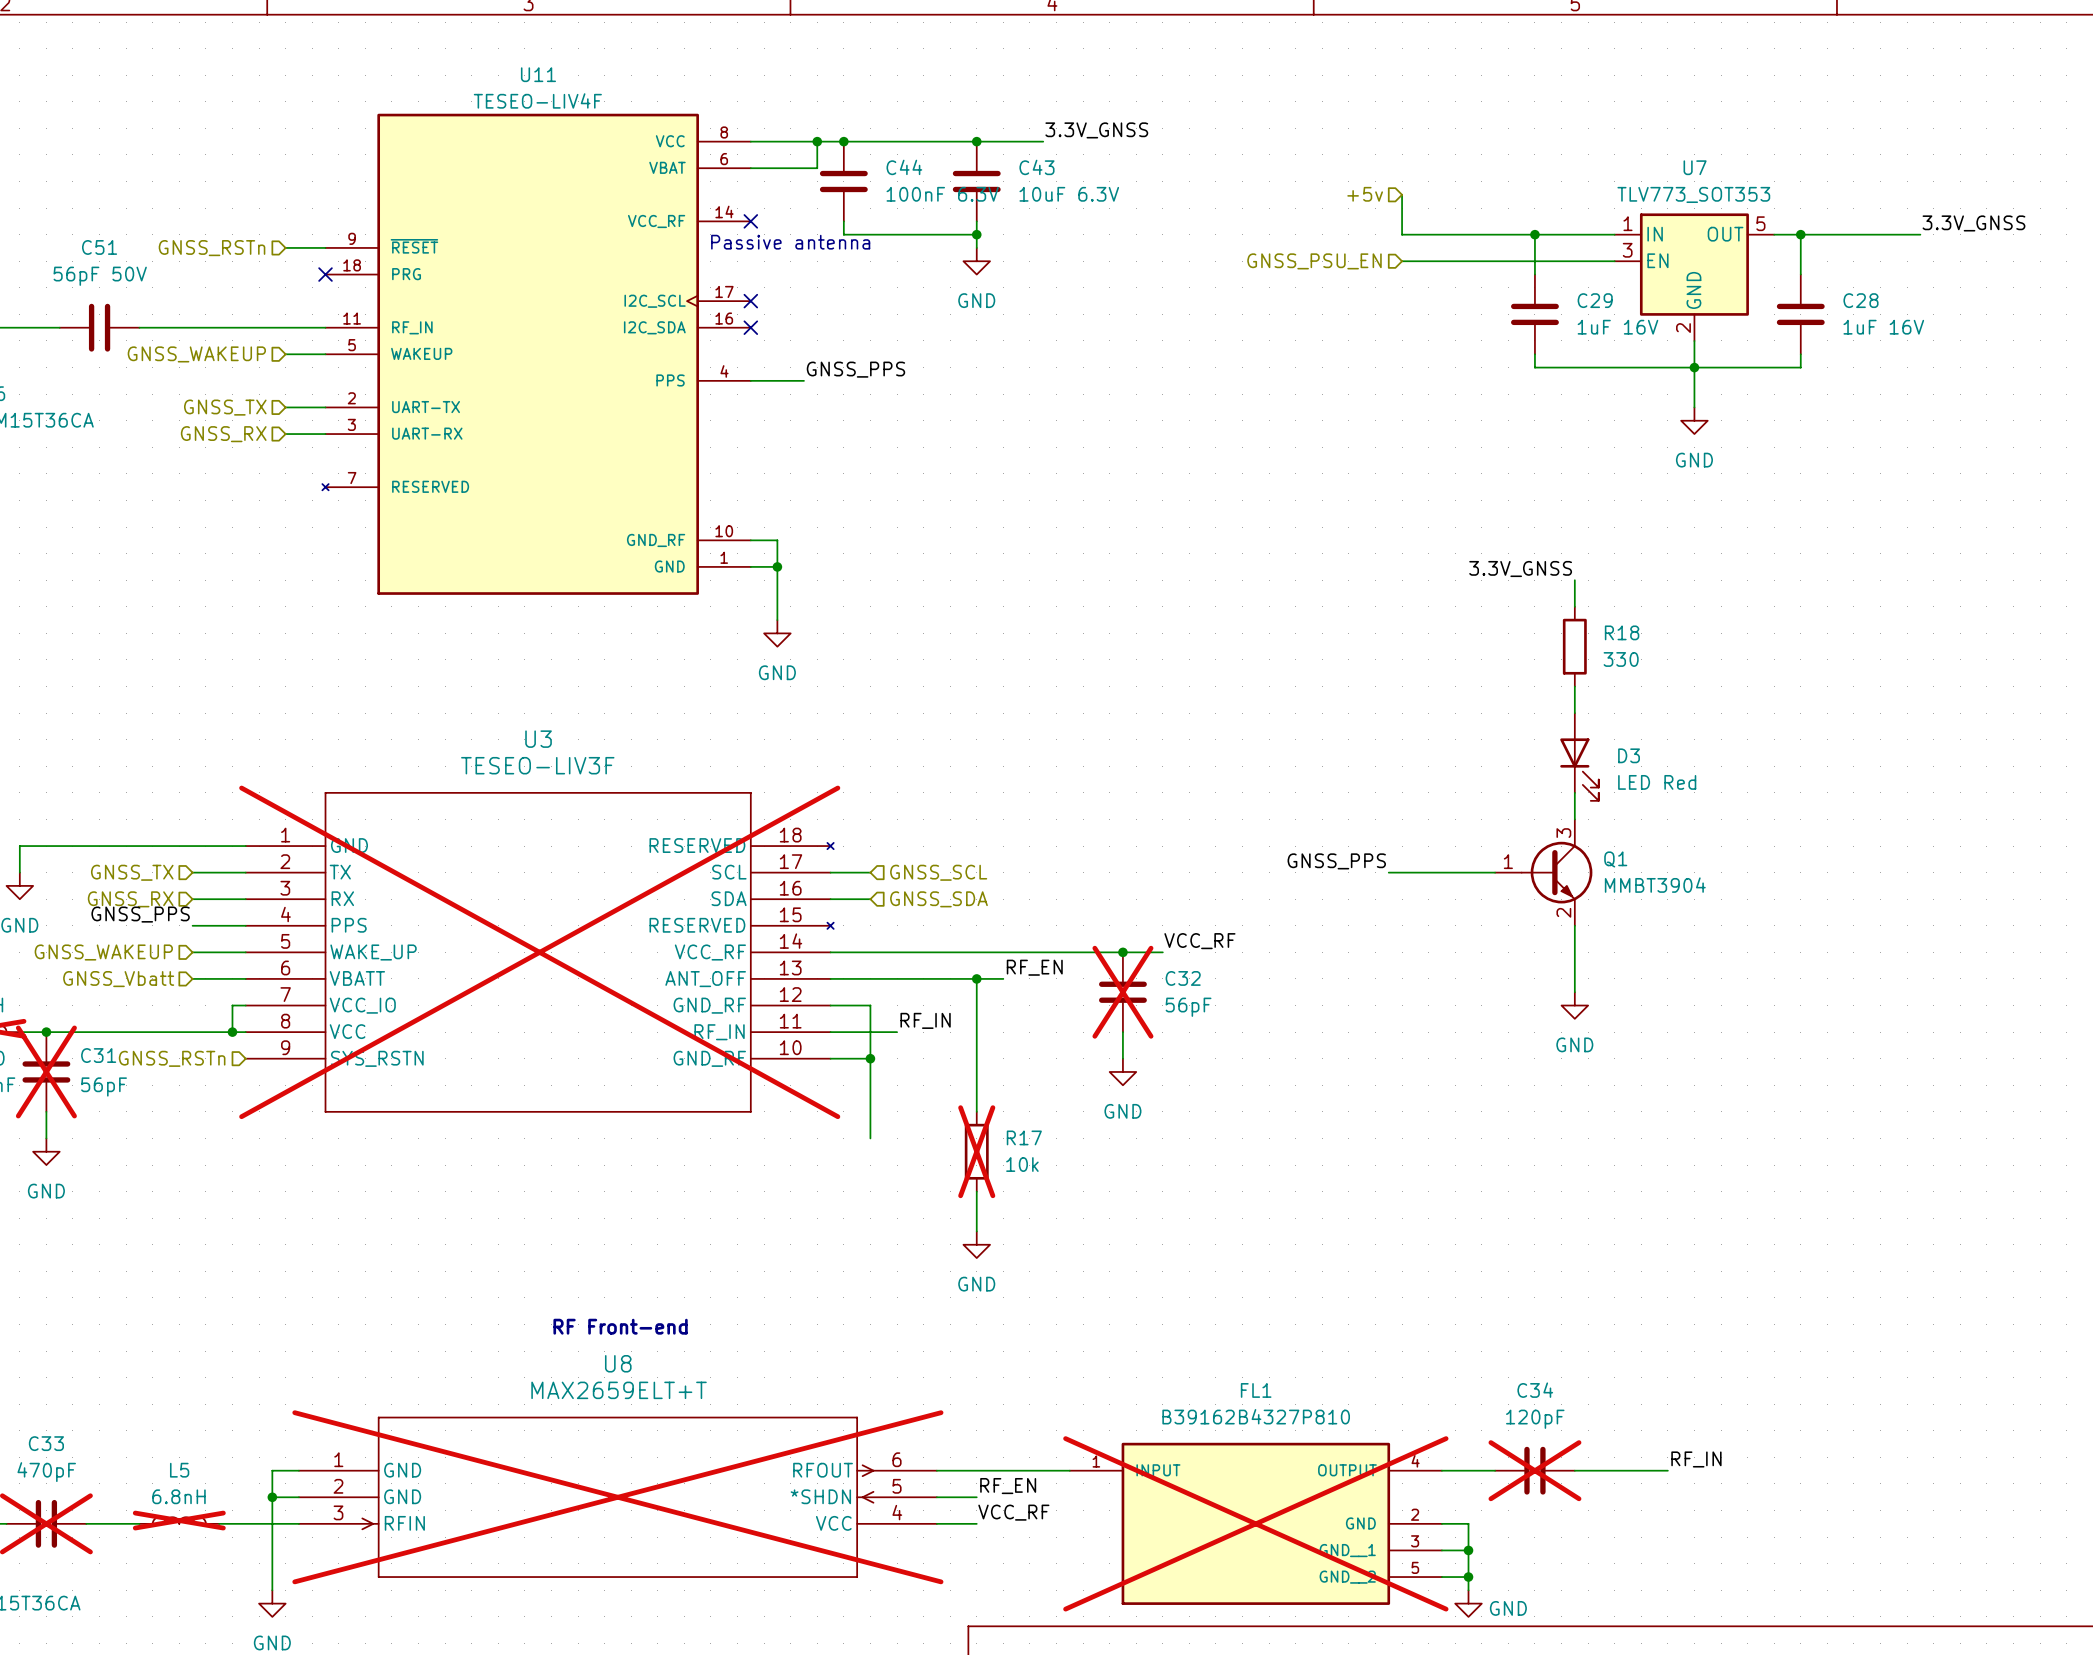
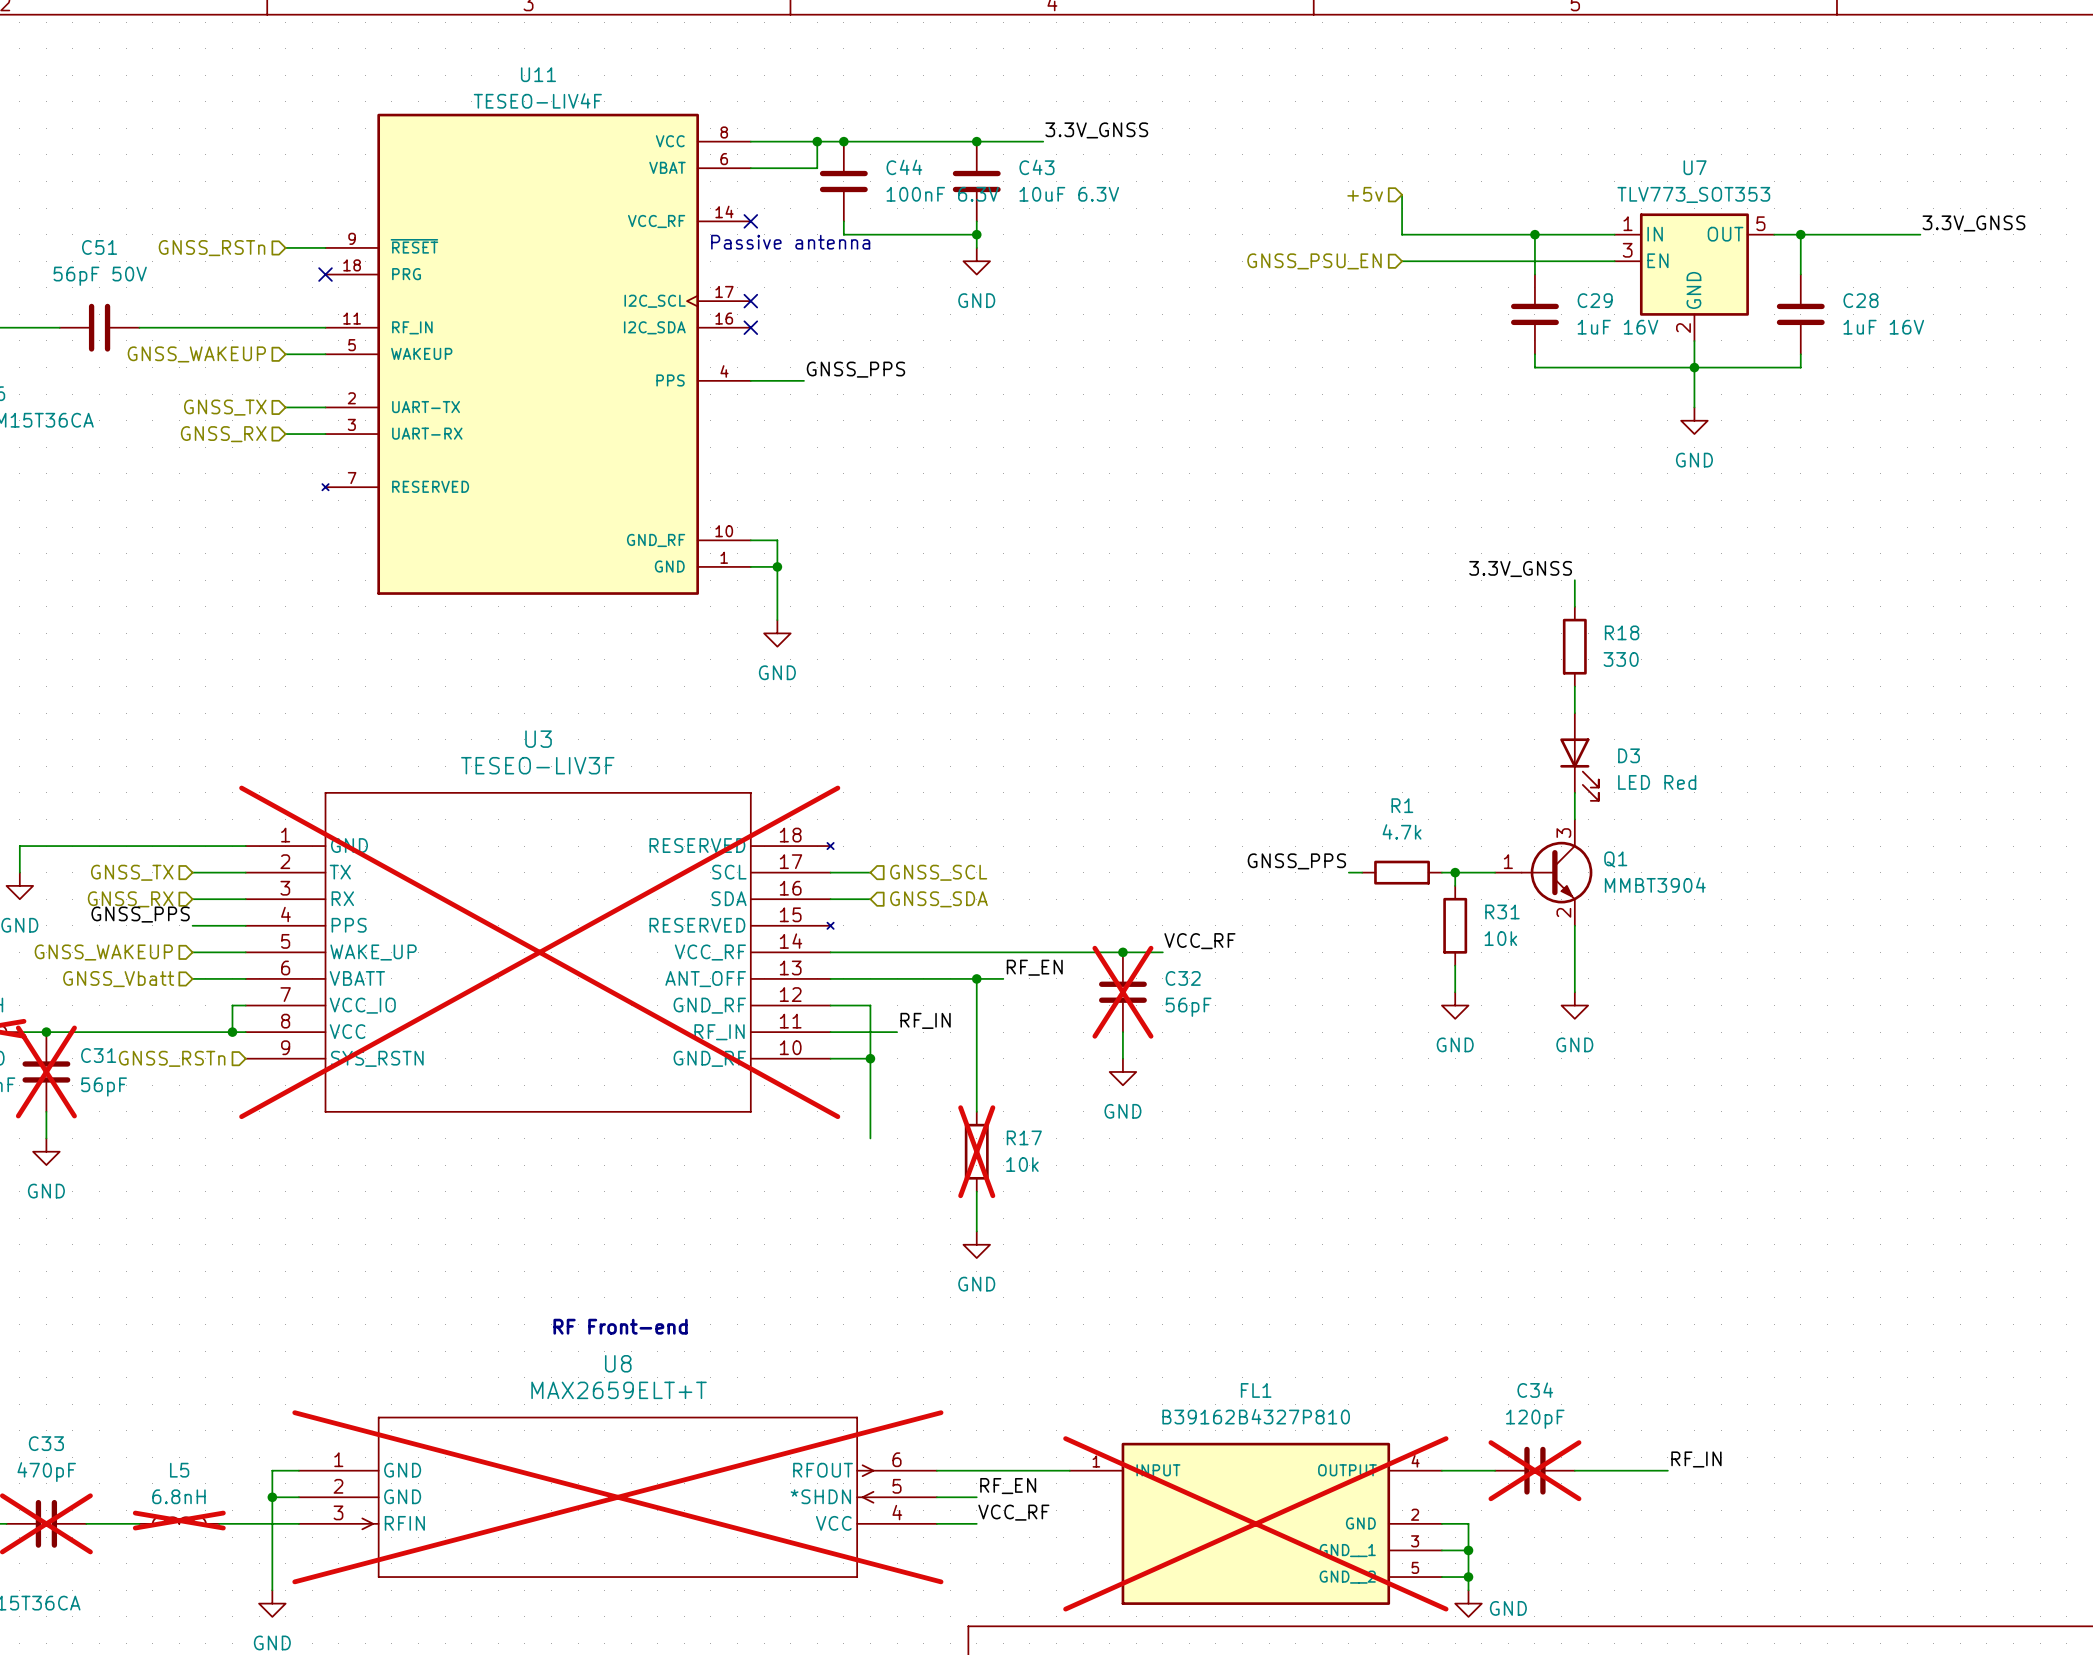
label position: GNSS_PPS (1336, 861) -> GNSS_PPS (1296, 861)
wire: none -> (1348, 872) (1362, 872)
wire: (1388, 872) (1441, 872) -> none
R1: none -> 4.7k (1402, 872)
wire: none -> (1455, 872) (1455, 885)
junction: none -> (1455, 872)
R31: none -> 10k (1455, 925)
wire: none -> (1455, 965) (1455, 992)
power symbol: none -> GND (1455, 1005)

